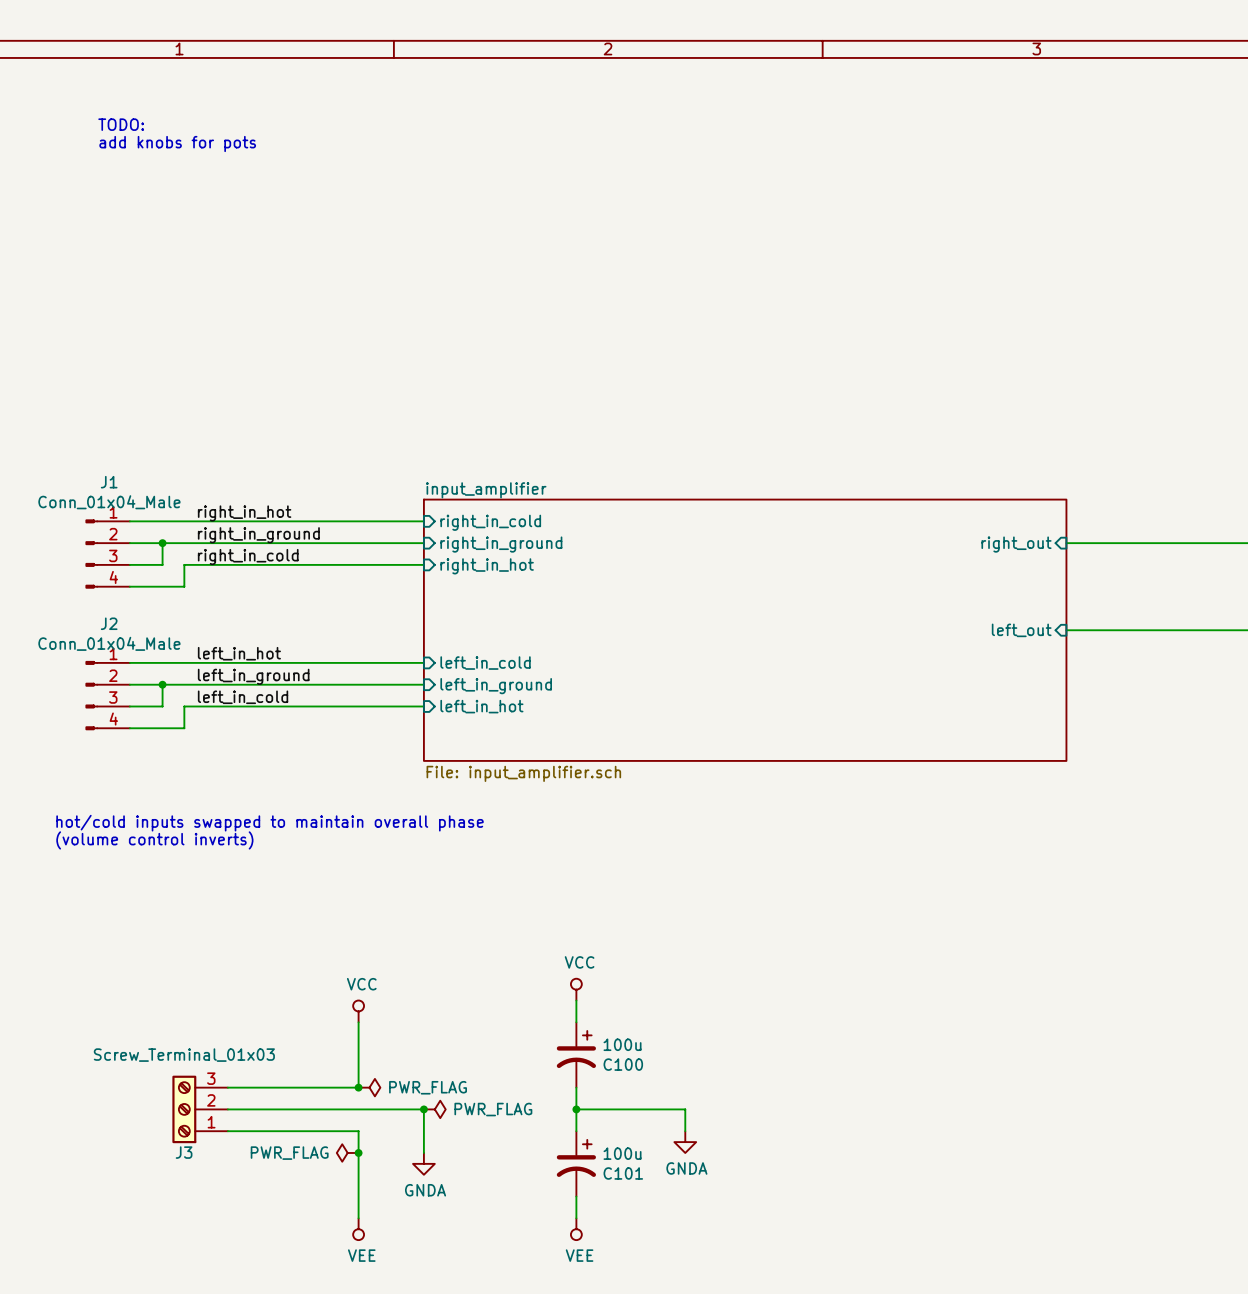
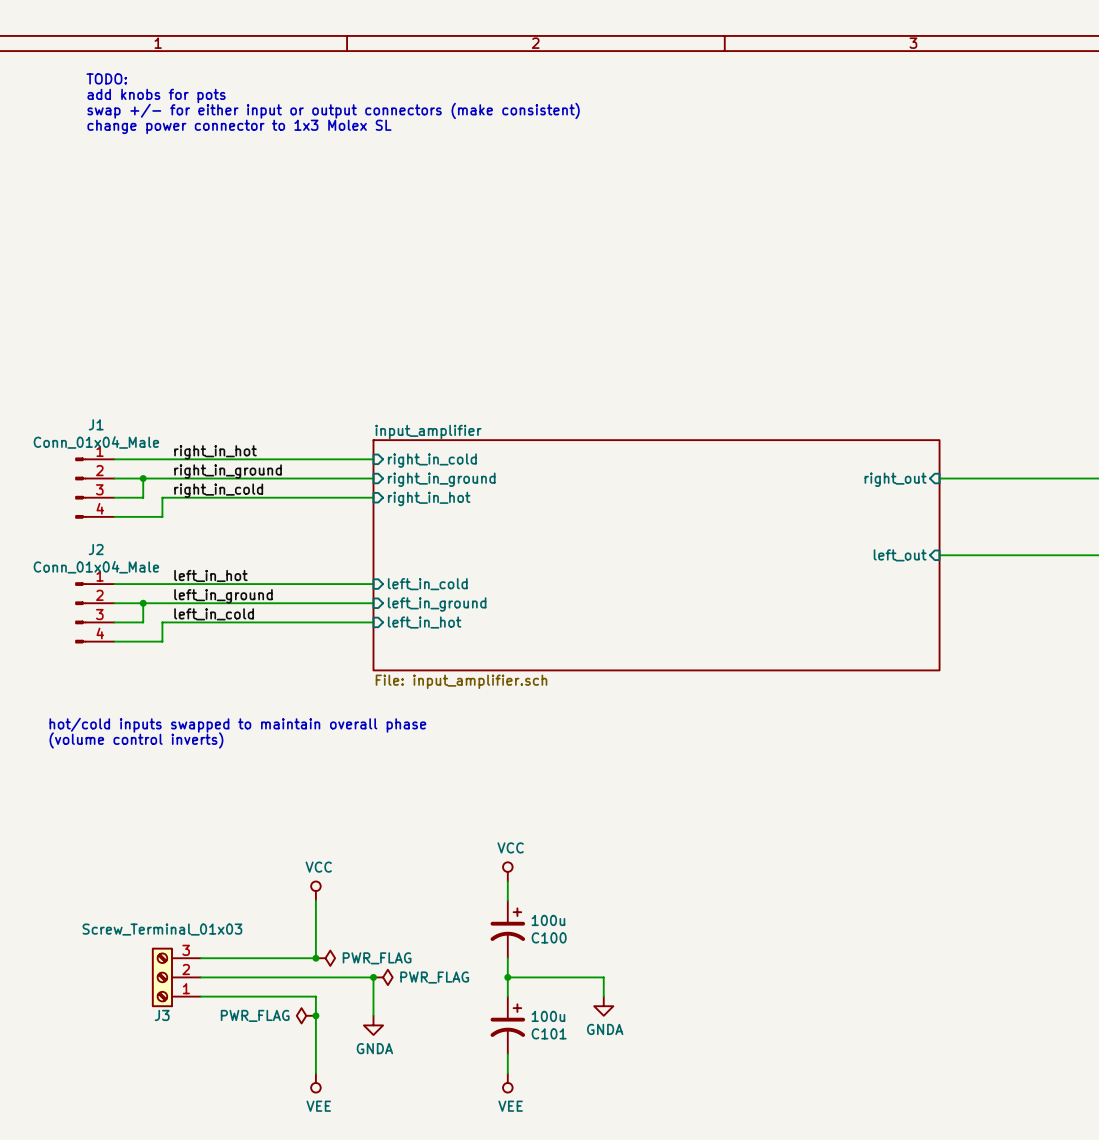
text: none -> TODO: (106, 78)
text: none -> add knobs for pots (156, 95)
text: TODO: (121, 124) -> swap +/- for either input or output connectors (make consistent) (333, 110)
text: add knobs for pots (177, 143) -> change power connector to 1x3 Molex SL (239, 126)

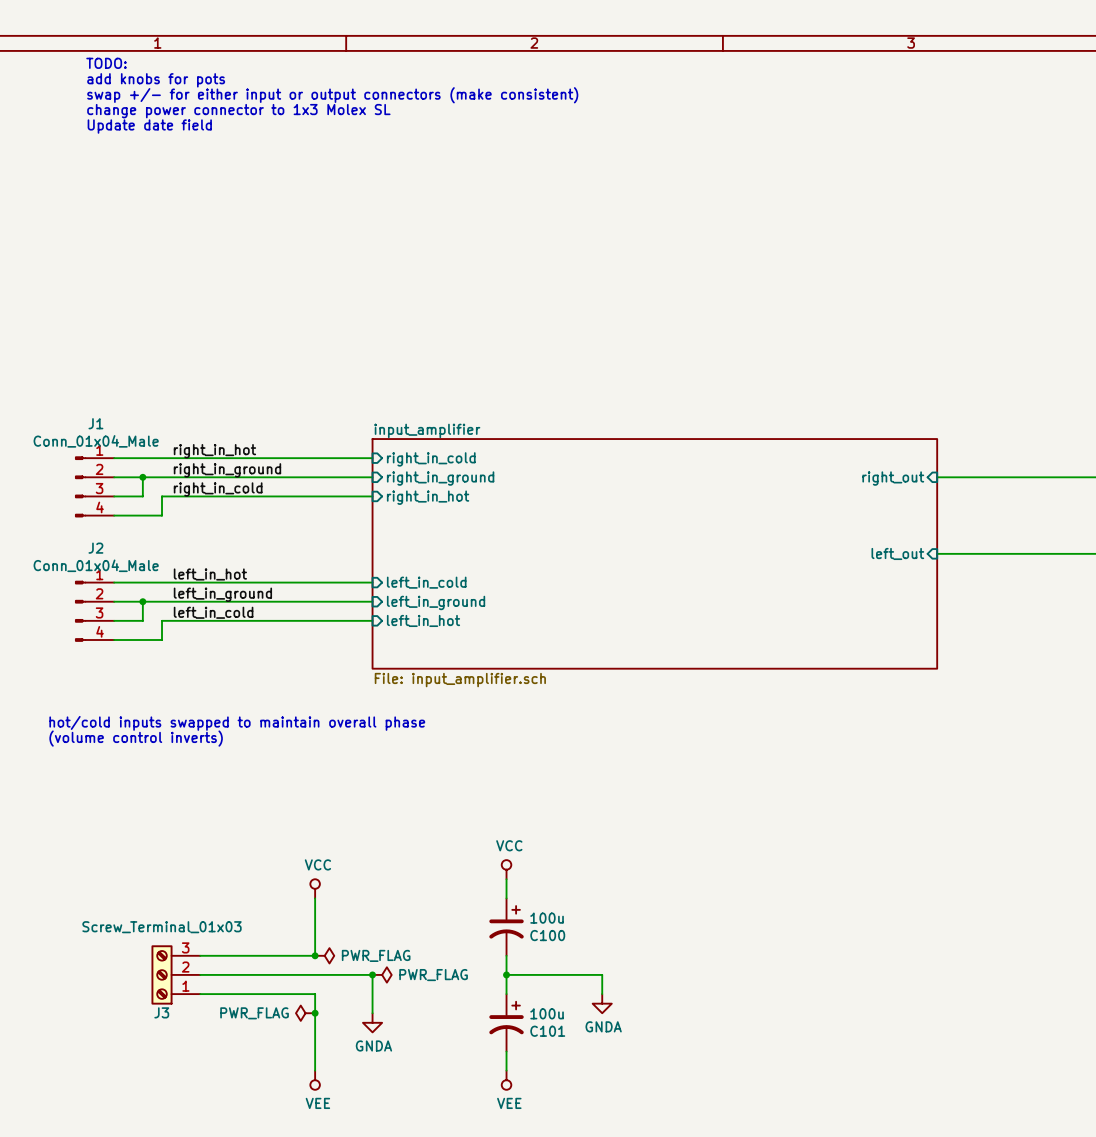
text: none -> TODO: (106, 63)
text: TODO: (106, 78) -> add knobs for pots (156, 80)
text: add knobs for pots (156, 95) -> swap +/- for either input or output connectors (make consistent) (332, 95)
text: swap +/- for either input or output connectors (make consistent) (333, 110) -> change power connector to 1x3 Molex SL (238, 111)
text: change power connector to 1x3 Molex SL (239, 126) -> Update date field (149, 126)

